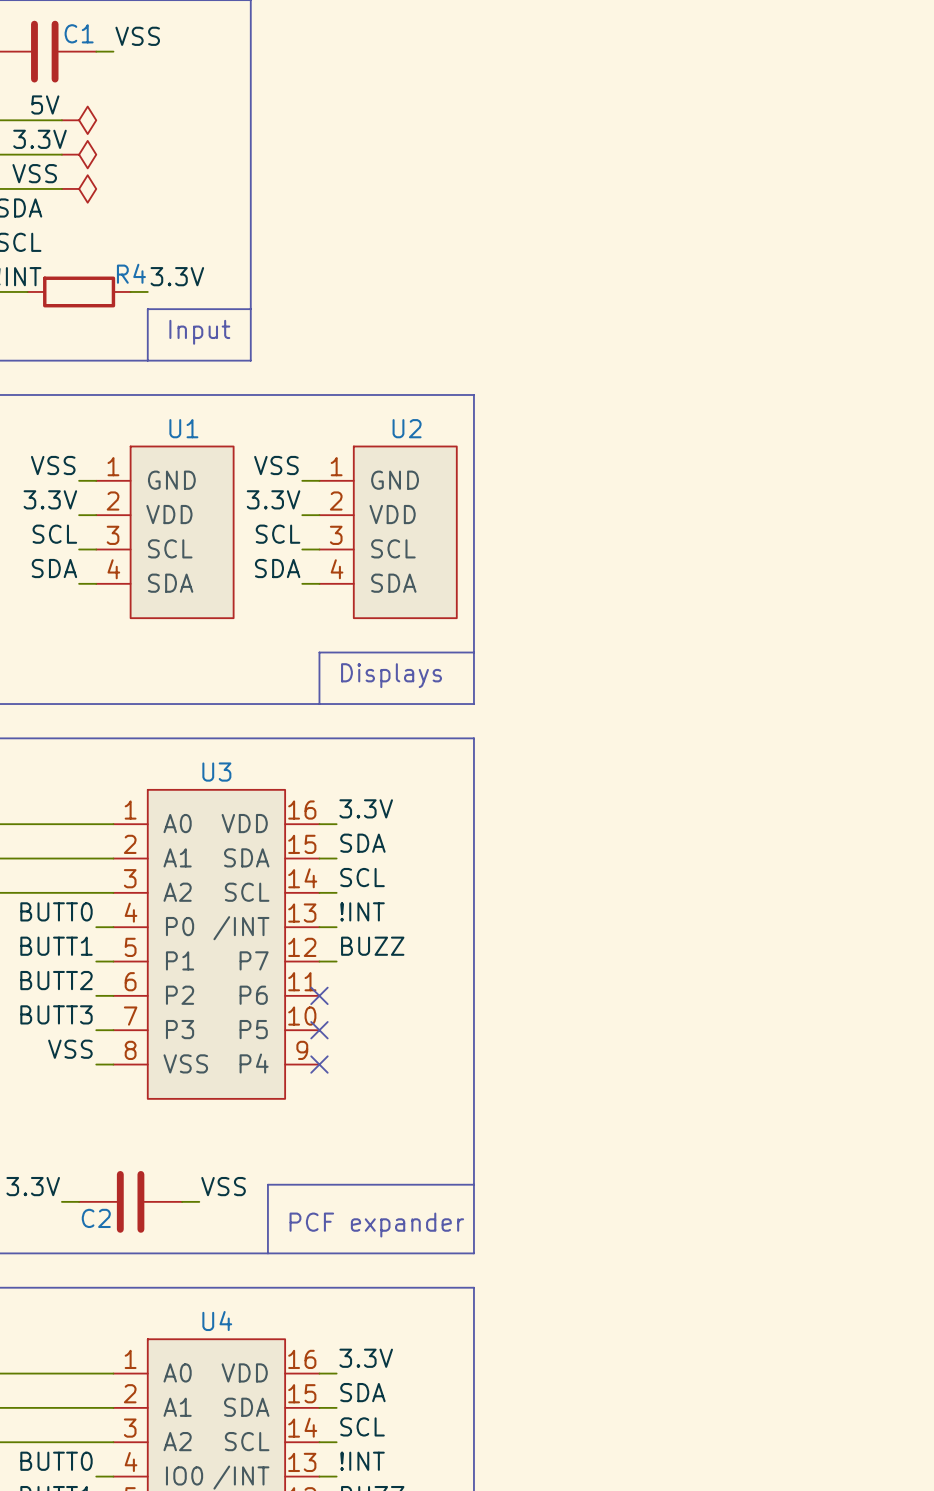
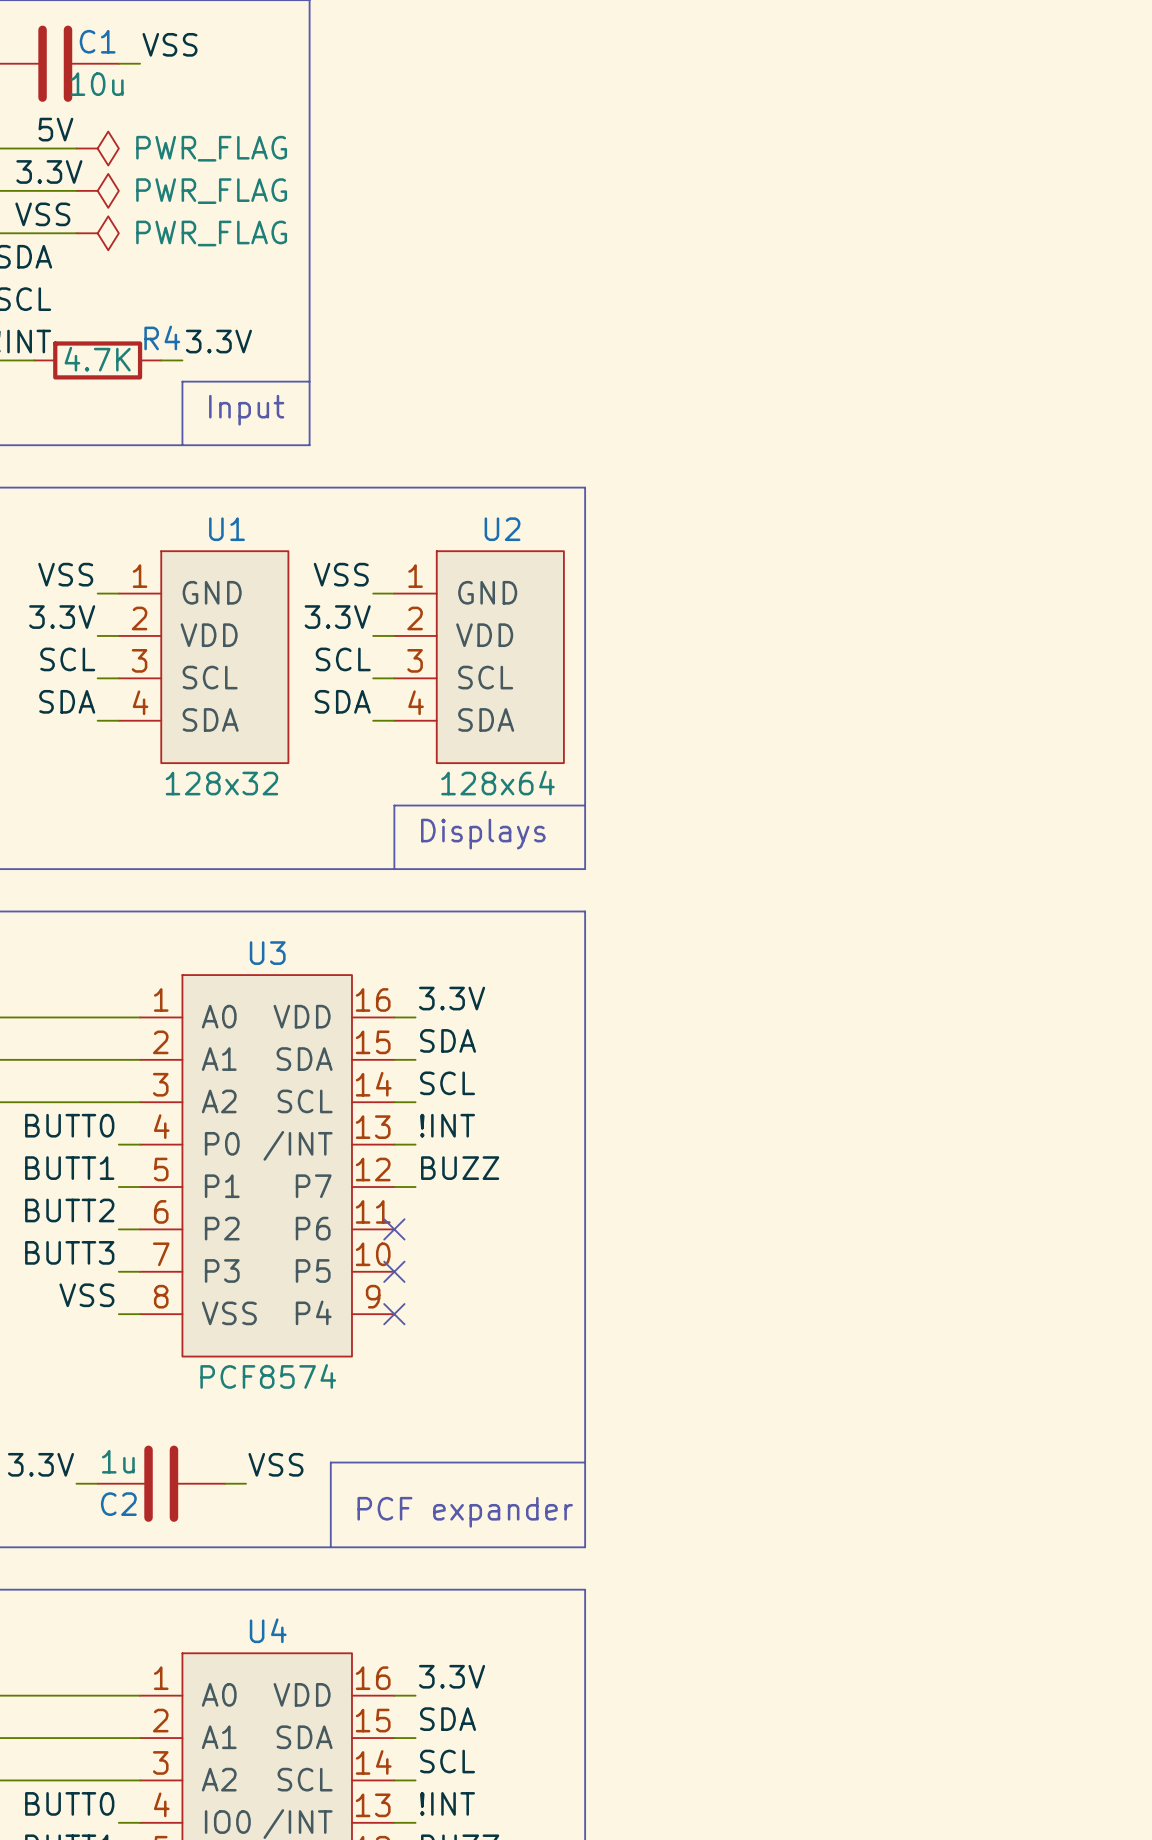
C1 value: none -> 10u (97, 84)
power symbol text: none -> PWR_FLAG (211, 148)
power symbol text: none -> PWR_FLAG (211, 191)
power symbol text: none -> PWR_FLAG (211, 233)
R4 value: none -> 4.7K (97, 359)
U1 value: none -> 128x32 (221, 783)
U2 value: none -> 128x64 (497, 783)
U3 value: none -> PCF8574 (268, 1376)
C2 value: none -> 1u (118, 1461)

